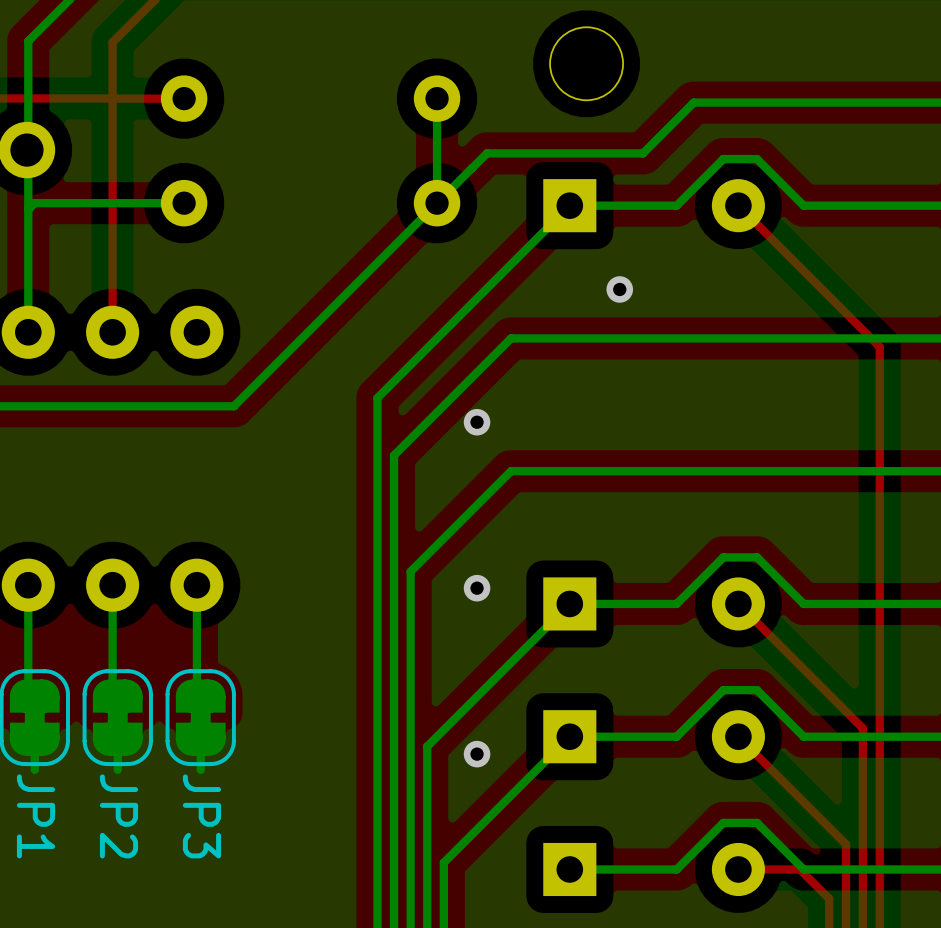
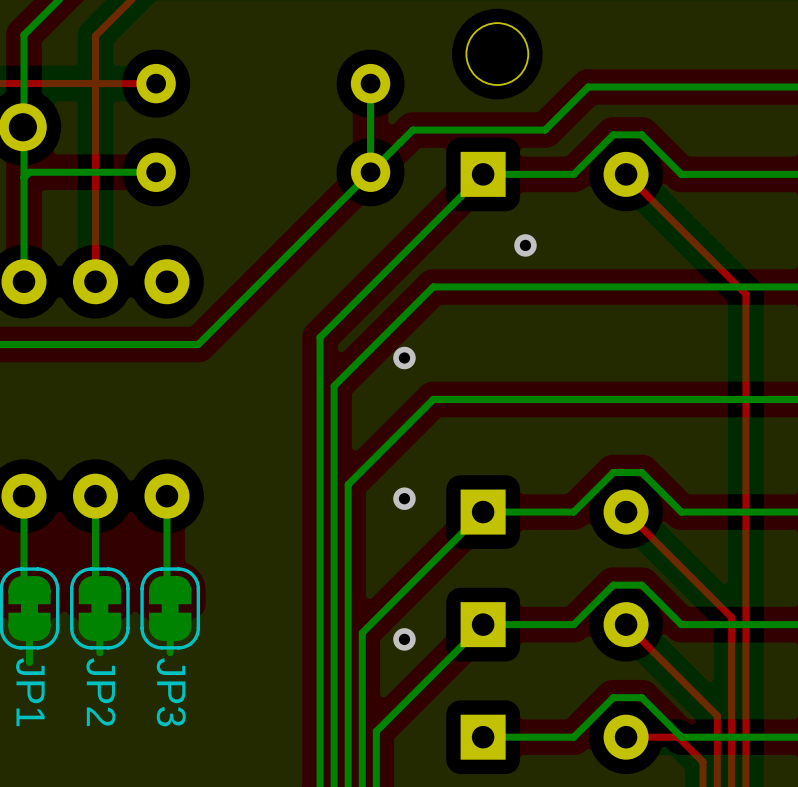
bottom track: none -> (29, 652) (29, 662)

